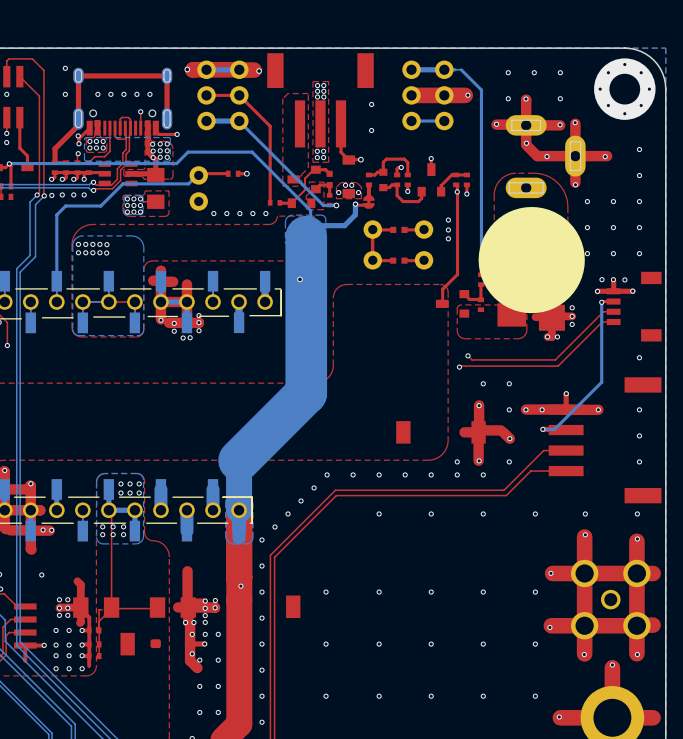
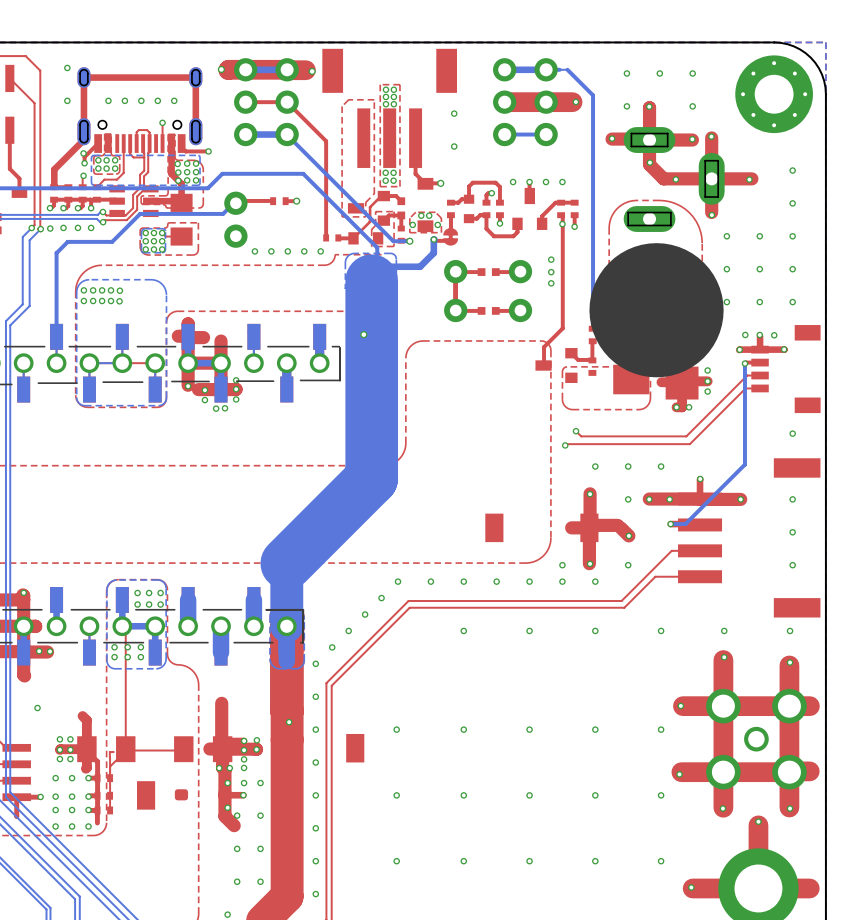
via: none -> (513, 182)
via: none -> (546, 182)
via: none -> (562, 182)
via: none -> (661, 466)

